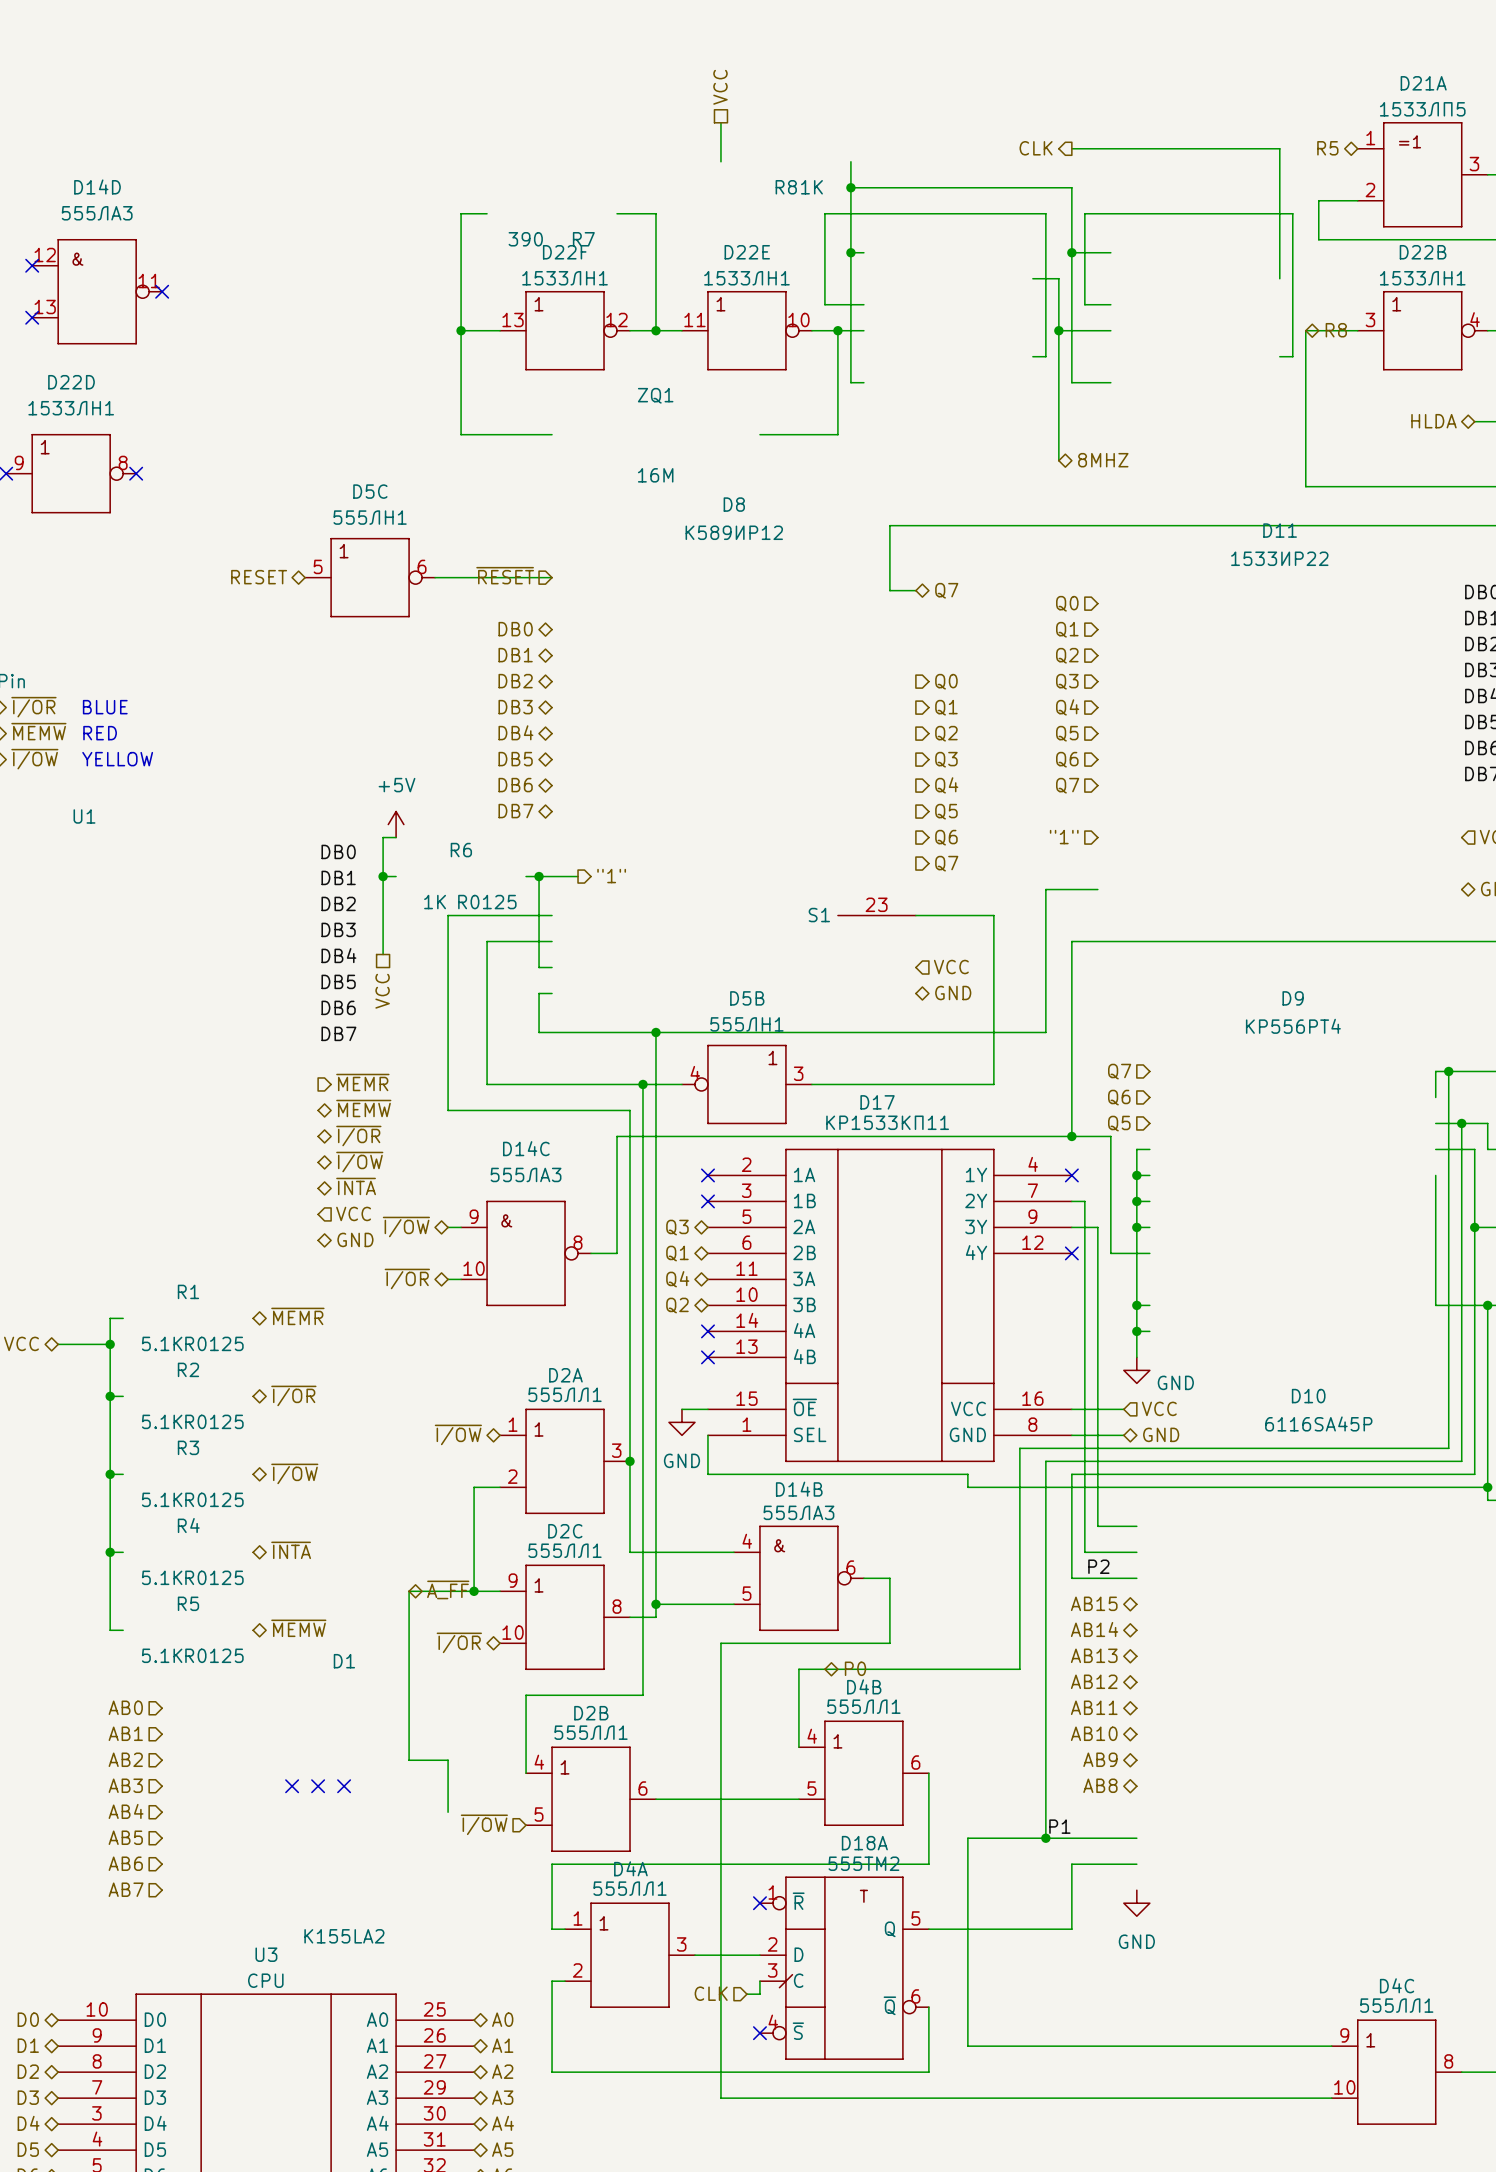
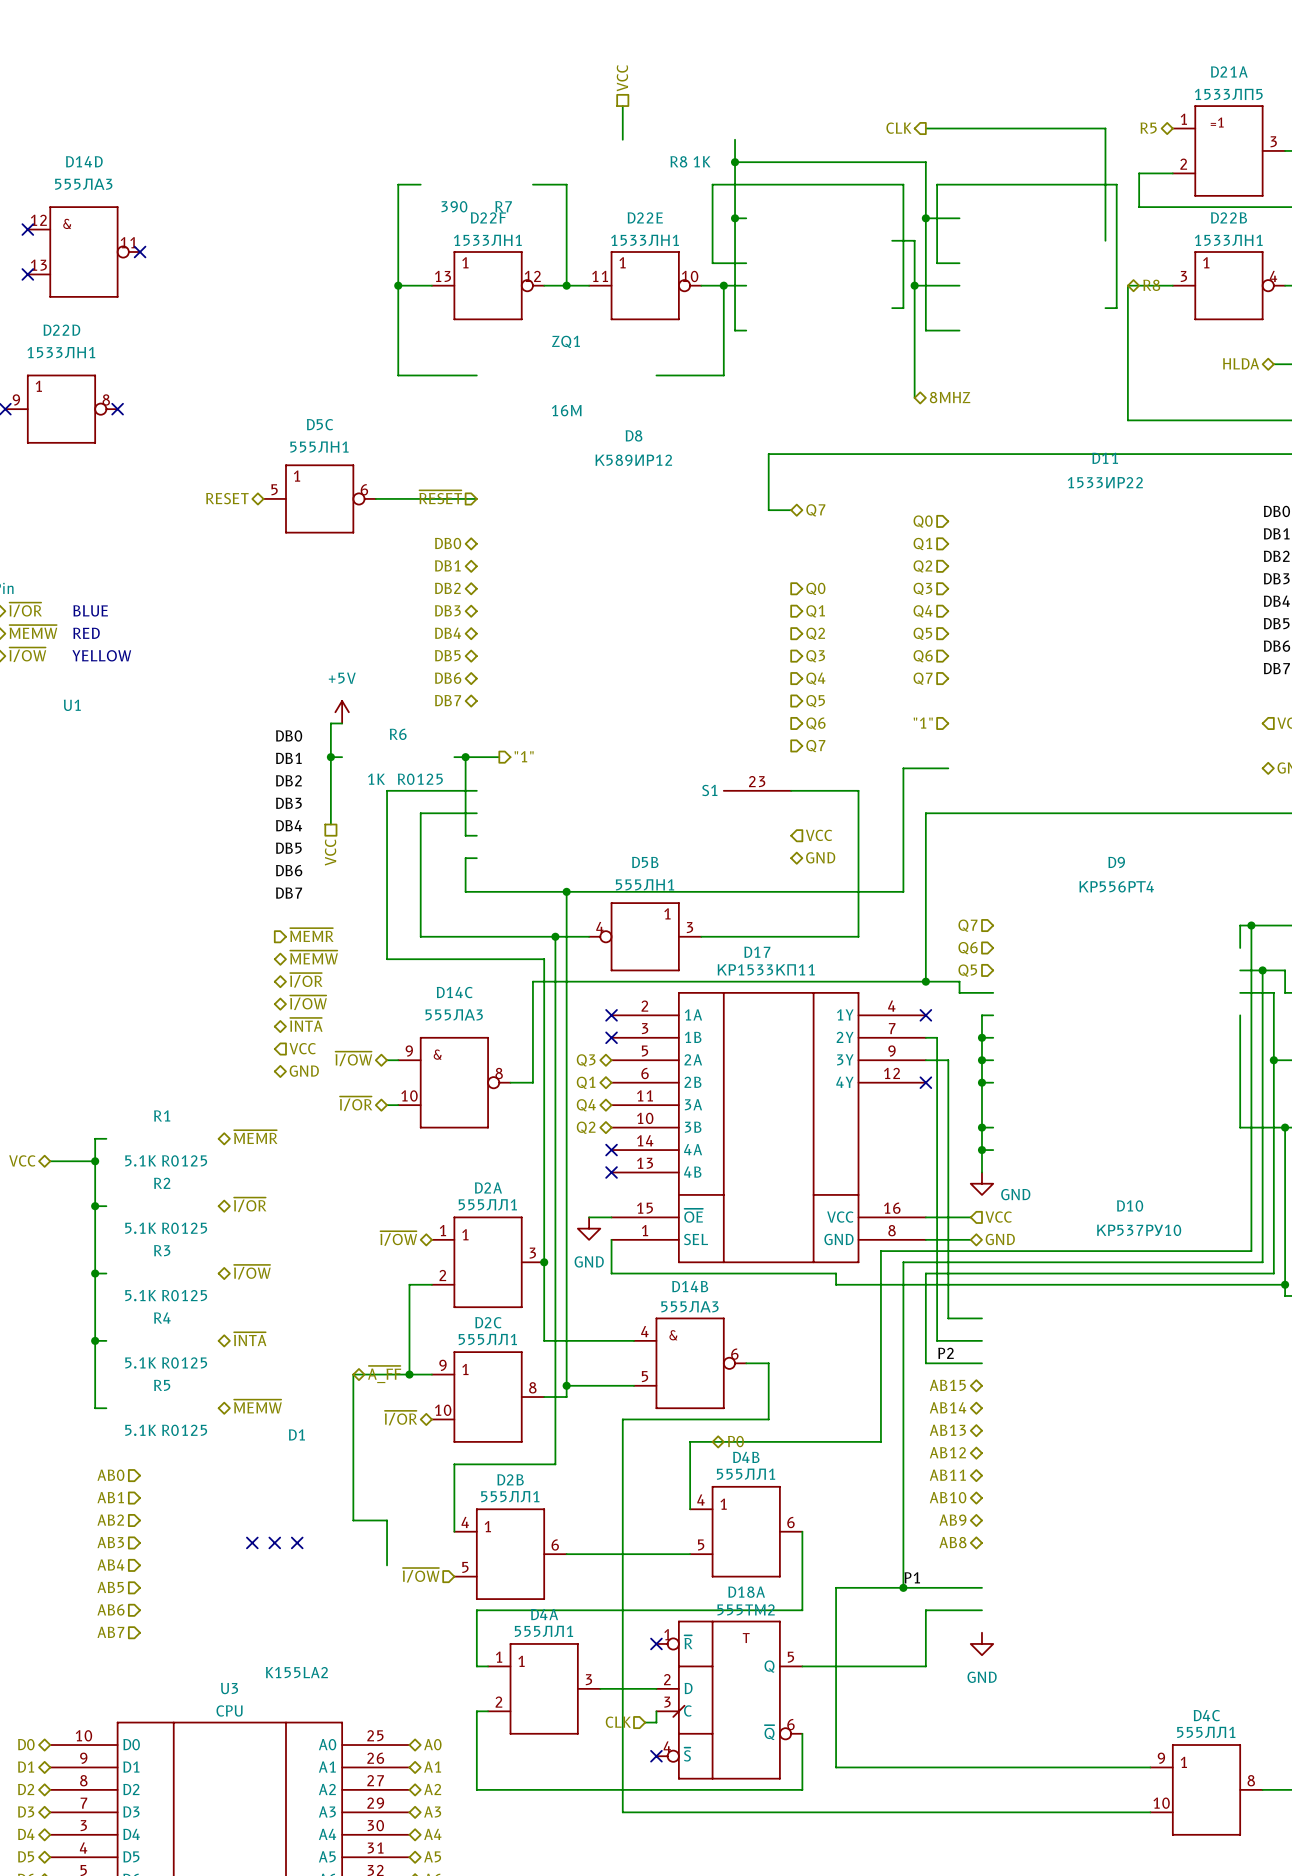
wire: (1110, 1149) (1110, 1253) (1136, 1253) -> none
wire: (1136, 1149) (1136, 1175) -> (981, 992) (959, 992)
junction: (1136, 1175) -> none
junction: none -> (981, 1082)
D10 value: 6116SA45P (1318, 1423) -> КР537РУ10 (1139, 1230)

